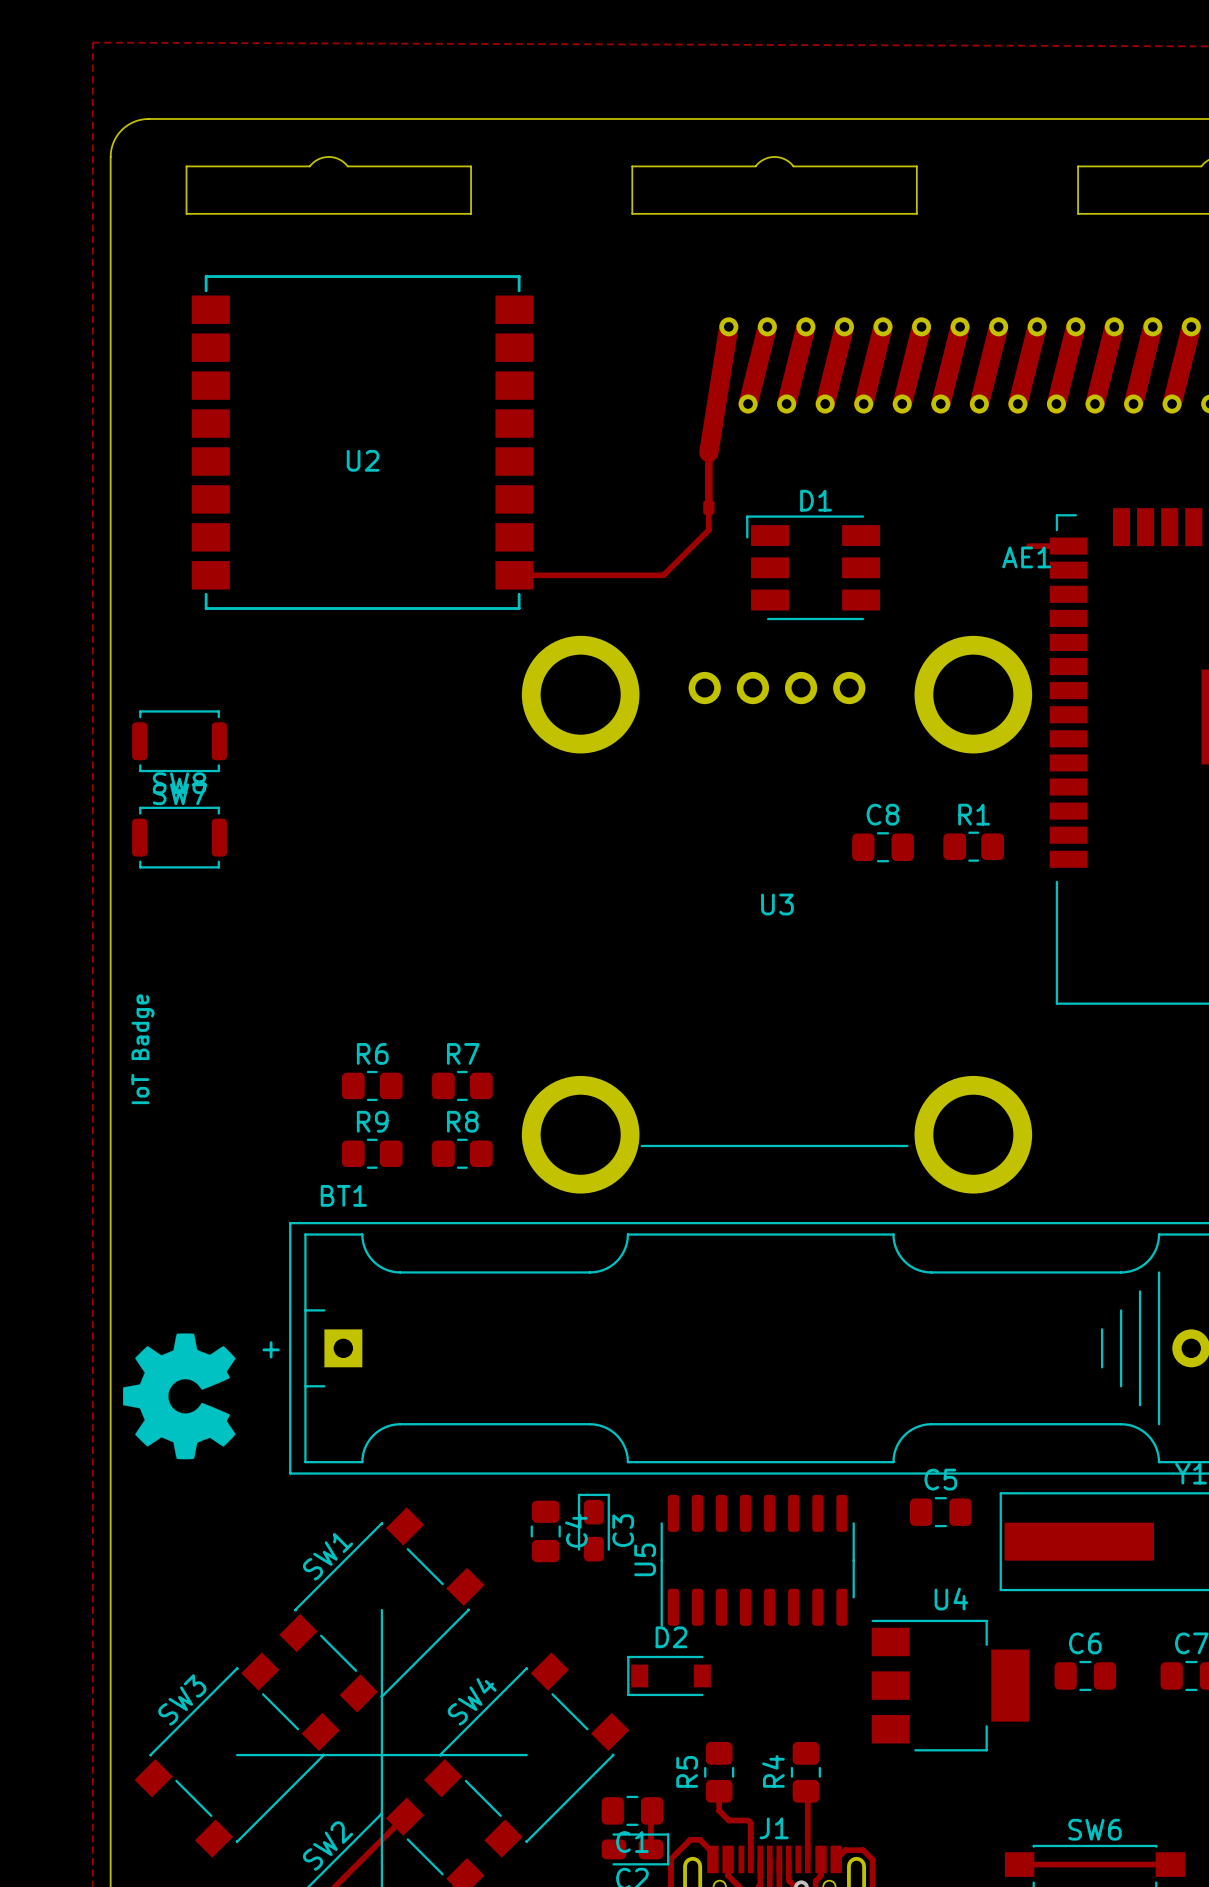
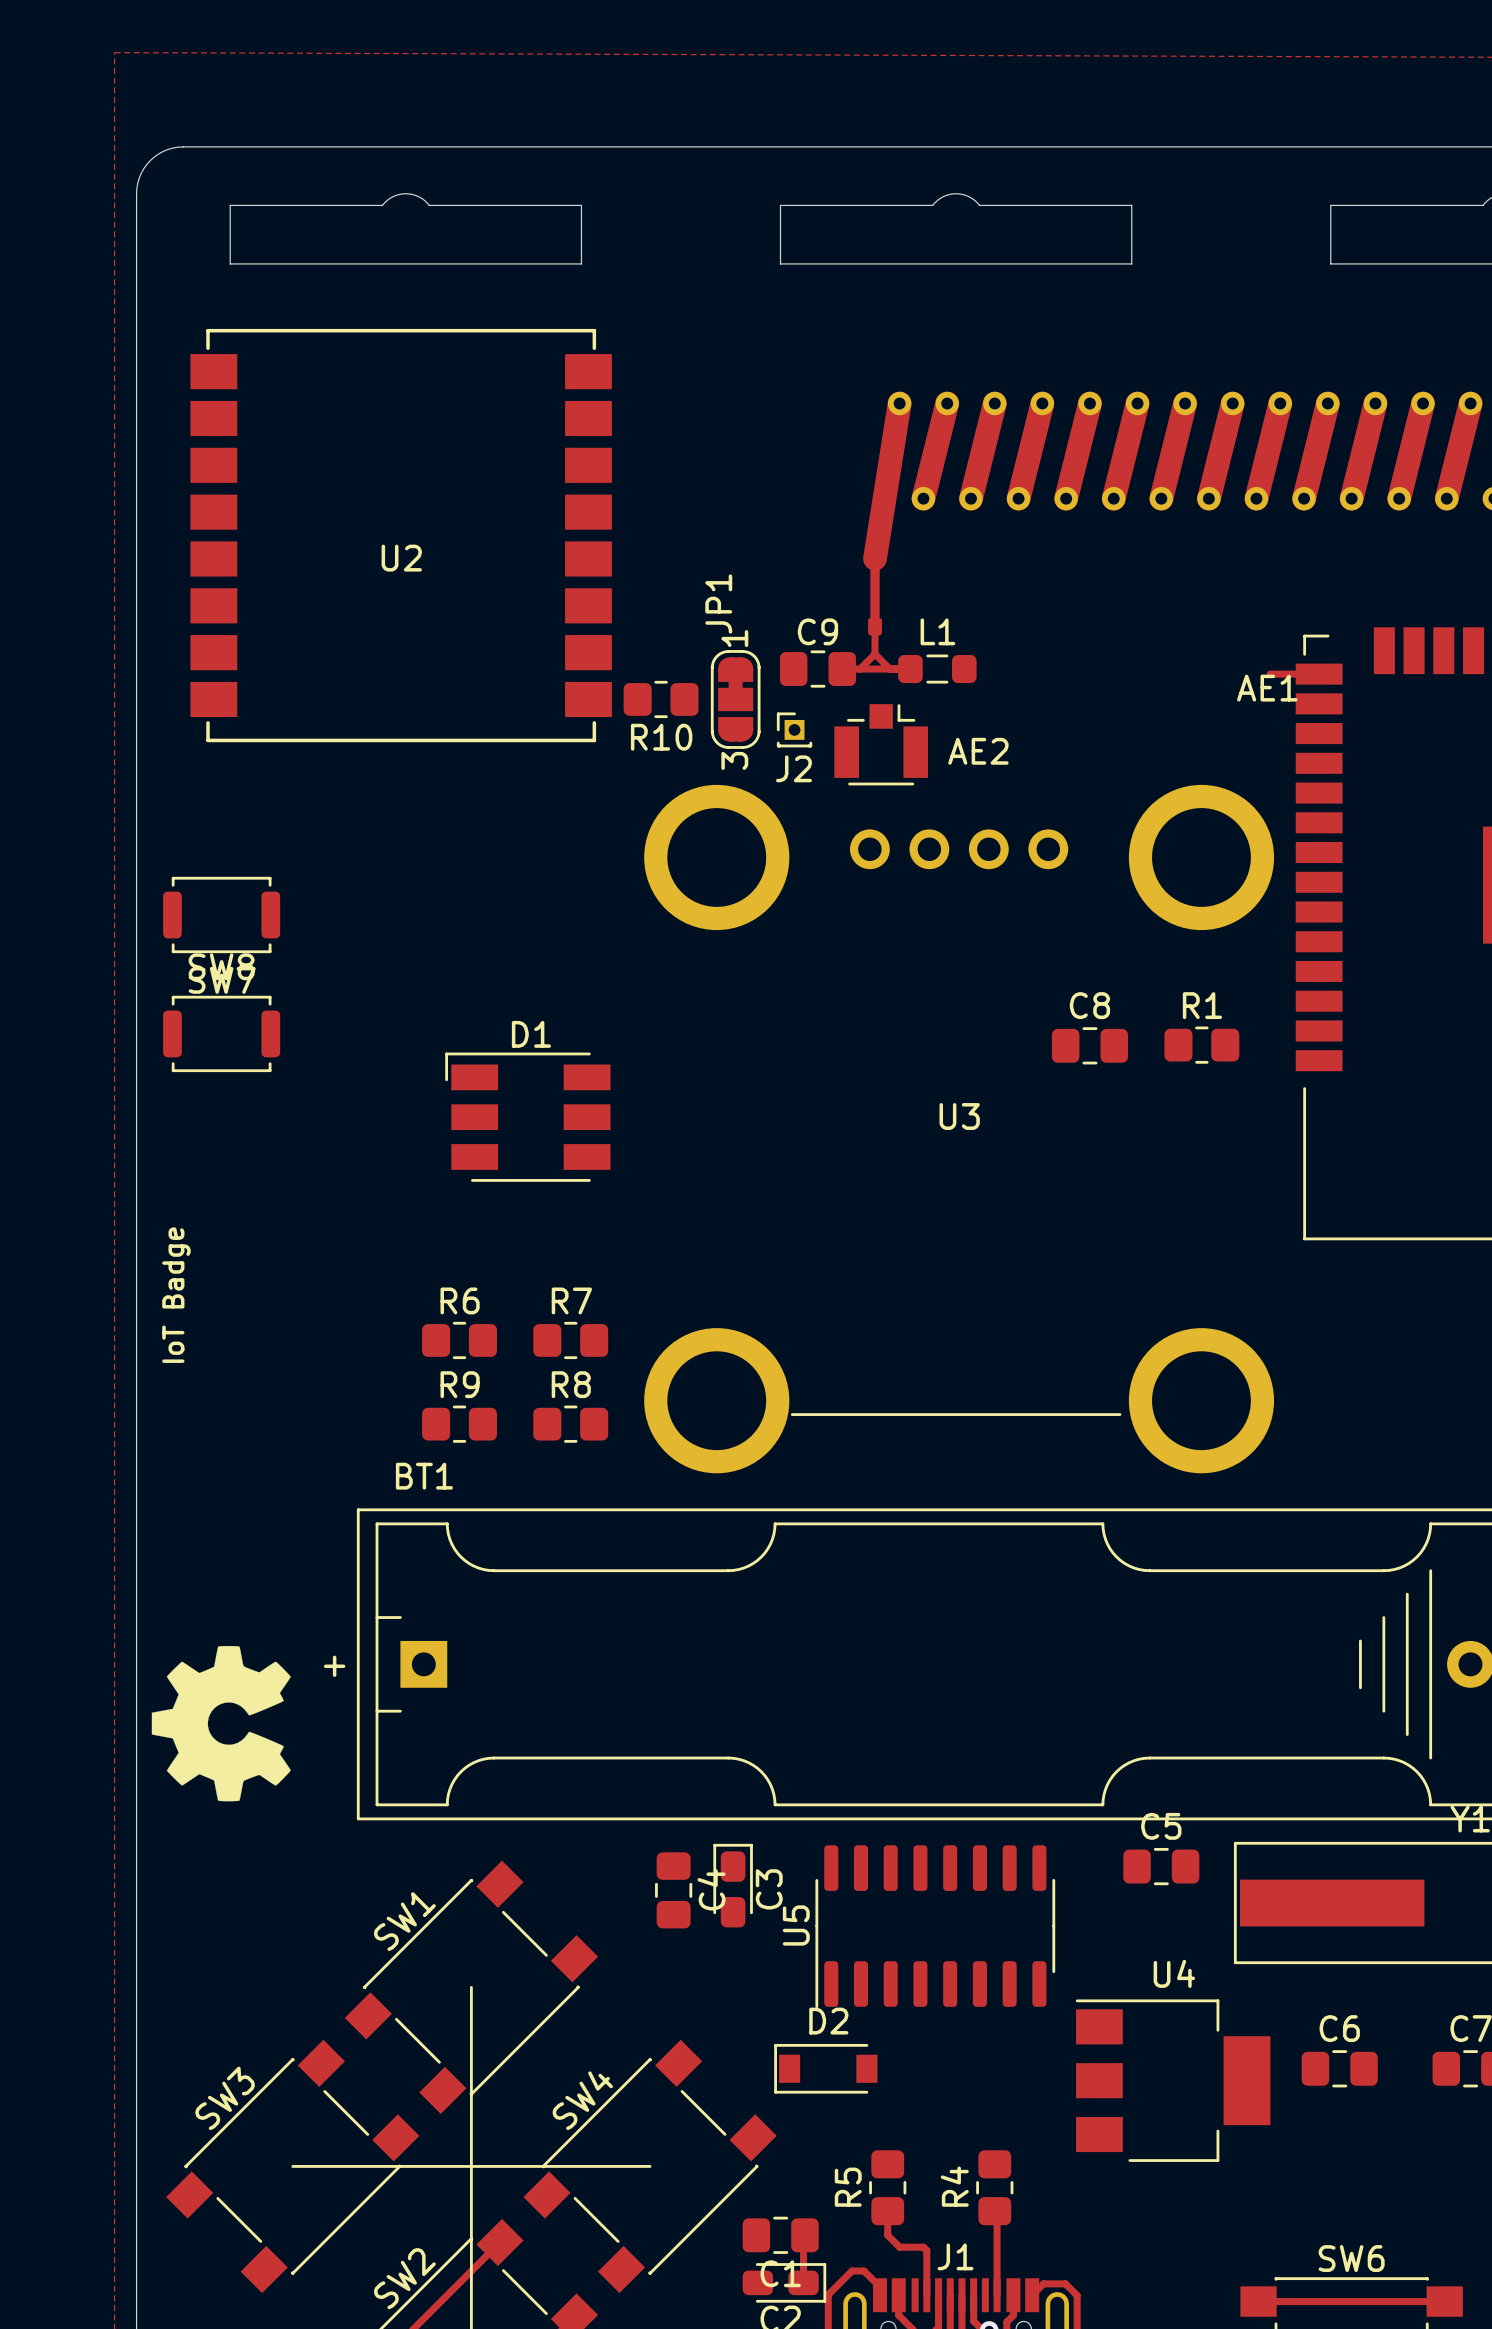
U2 position: (362, 442) -> (401, 535)
track: none -> (875, 654) (889, 669)
C9: none -> (817, 669)
track: none -> (842, 669) (910, 669)
track: (696, 542) (663, 575) (514, 575) -> none
L1: none -> (937, 669)
R10: none -> (661, 699)
JP1: none -> (735, 699)
D1 position: (813, 567) -> (527, 1117)
J2: none -> (794, 729)
AE2: none -> (881, 744)

